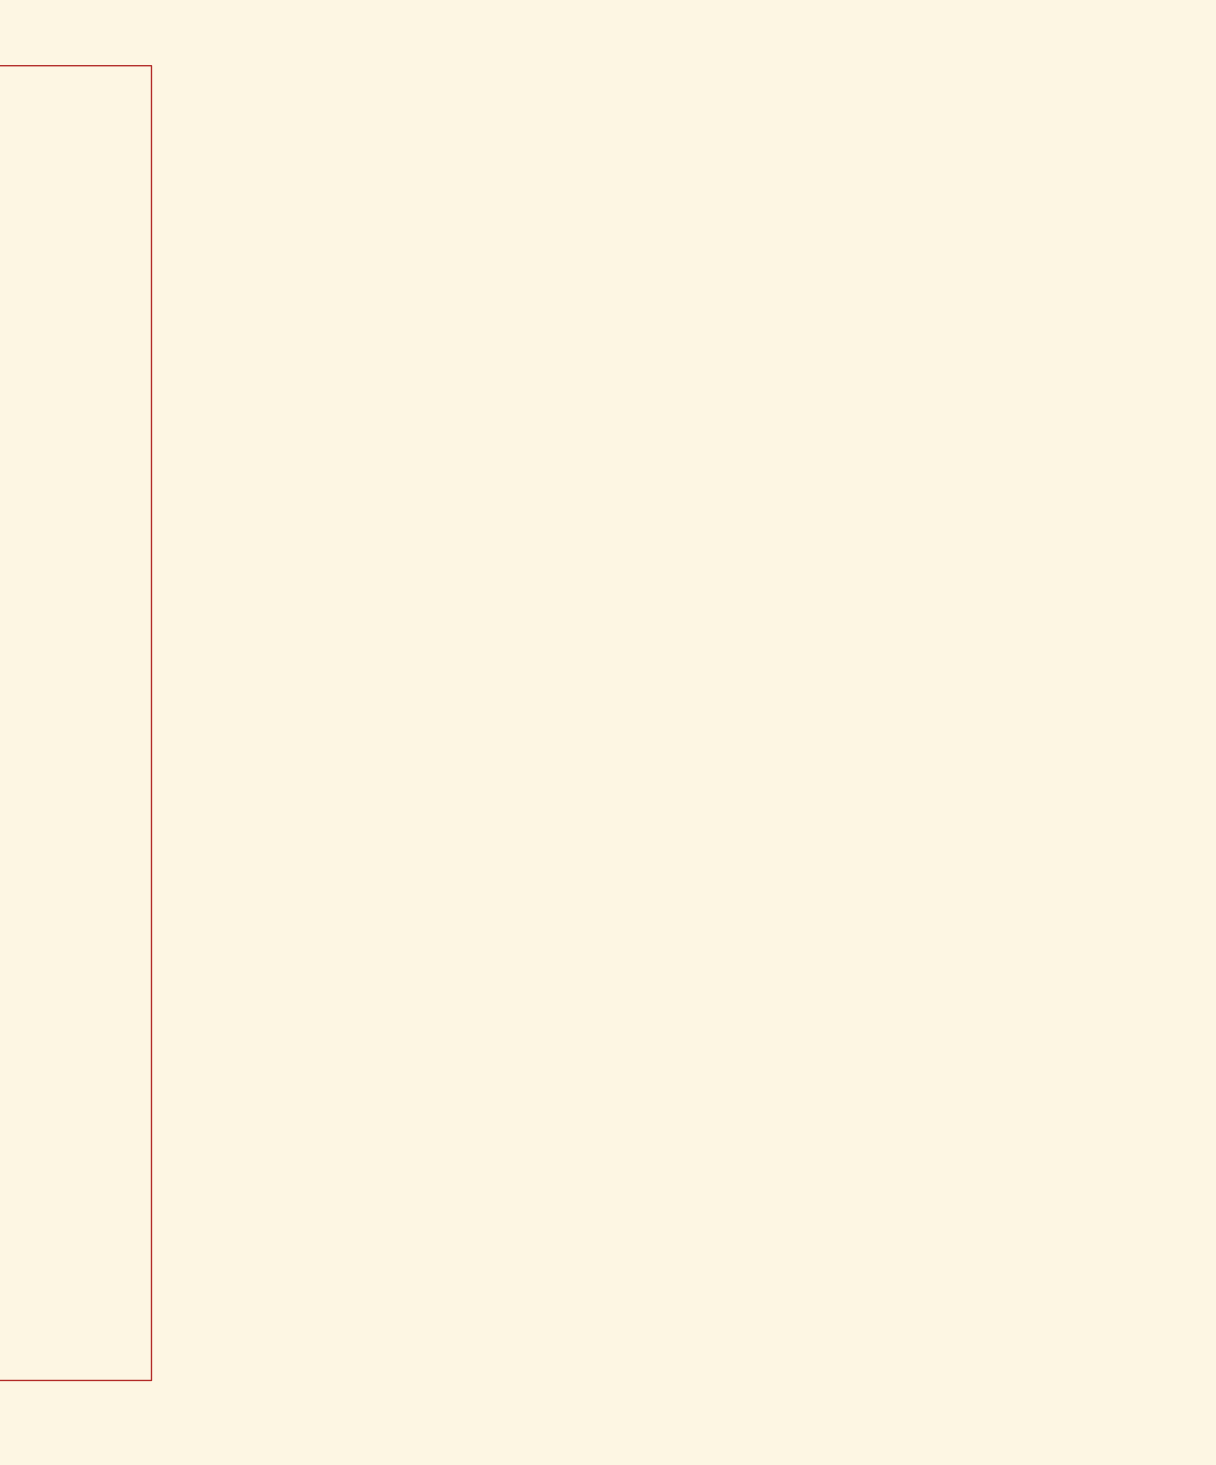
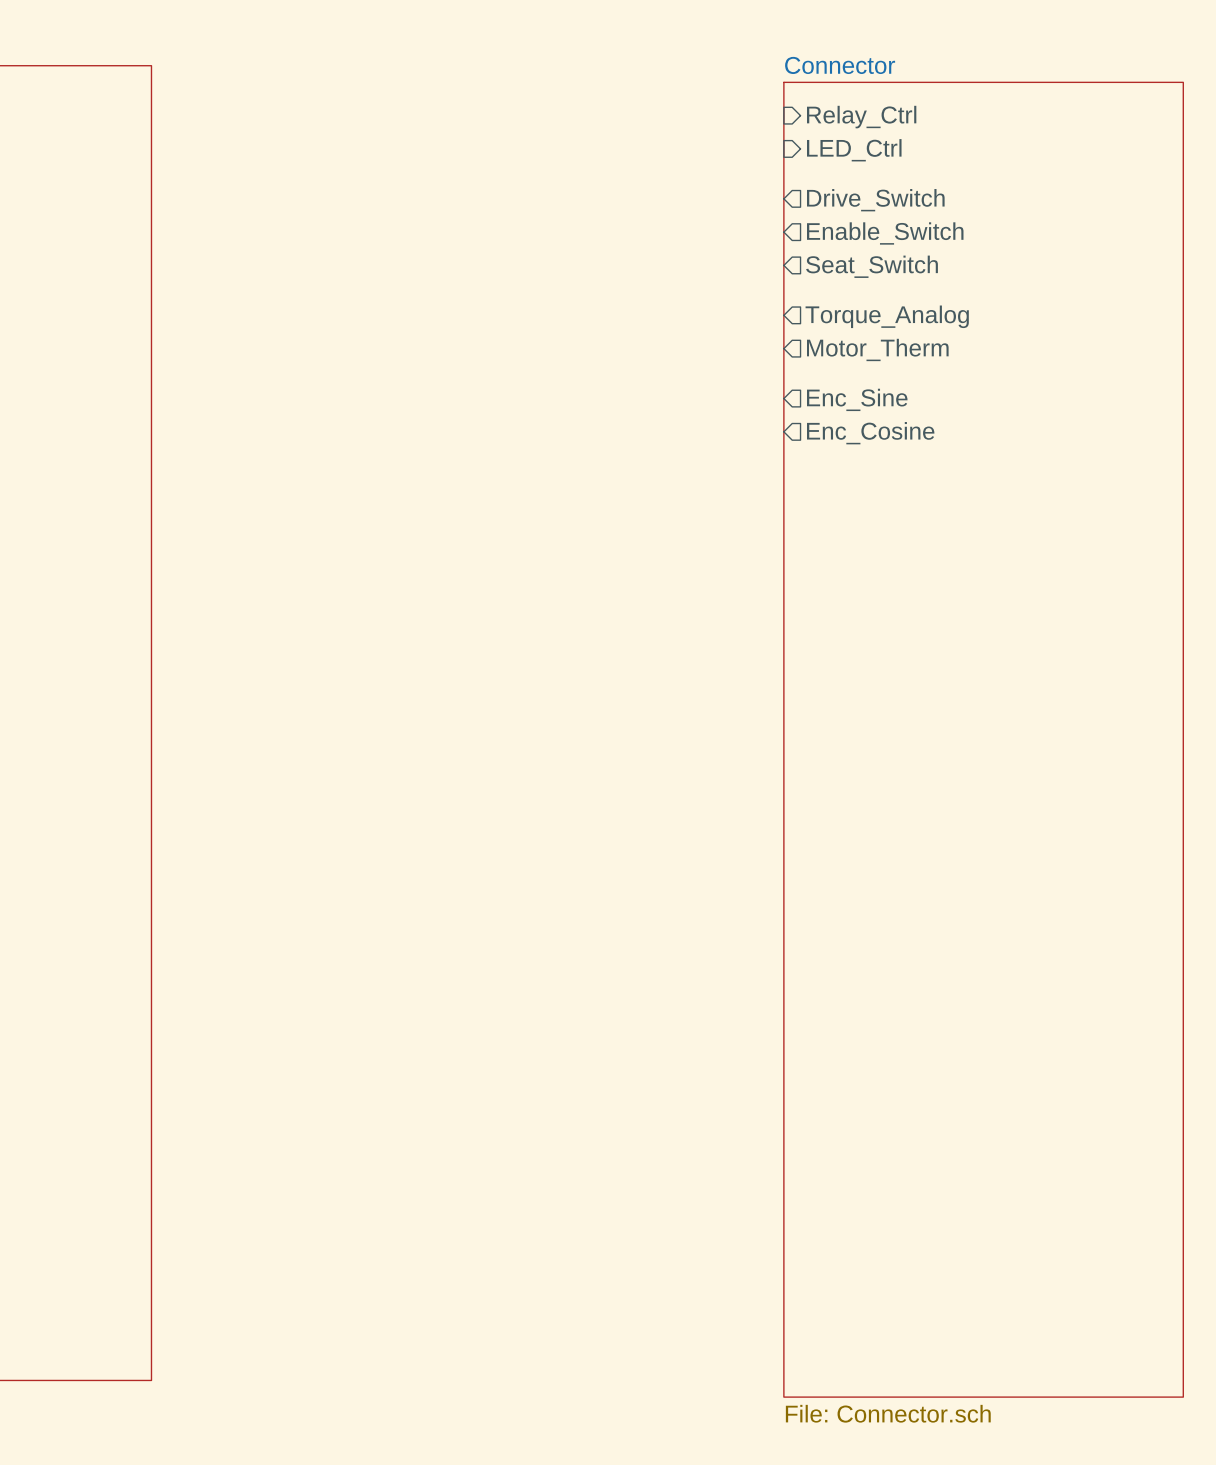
sheet pin: none -> Relay_Ctrl (861, 117)
sheet pin: none -> LED_Ctrl (854, 150)
sheet pin: none -> Drive_Switch (875, 200)
sheet pin: none -> Enable_Switch (885, 233)
sheet pin: none -> Seat_Switch (872, 266)
sheet pin: none -> Torque_Analog (887, 316)
sheet pin: none -> Motor_Therm (877, 349)
sheet pin: none -> Enc_Sine (857, 399)
sheet pin: none -> Enc_Cosine (870, 433)
sheet Connector: none -> File: Connector.sch (983, 739)

